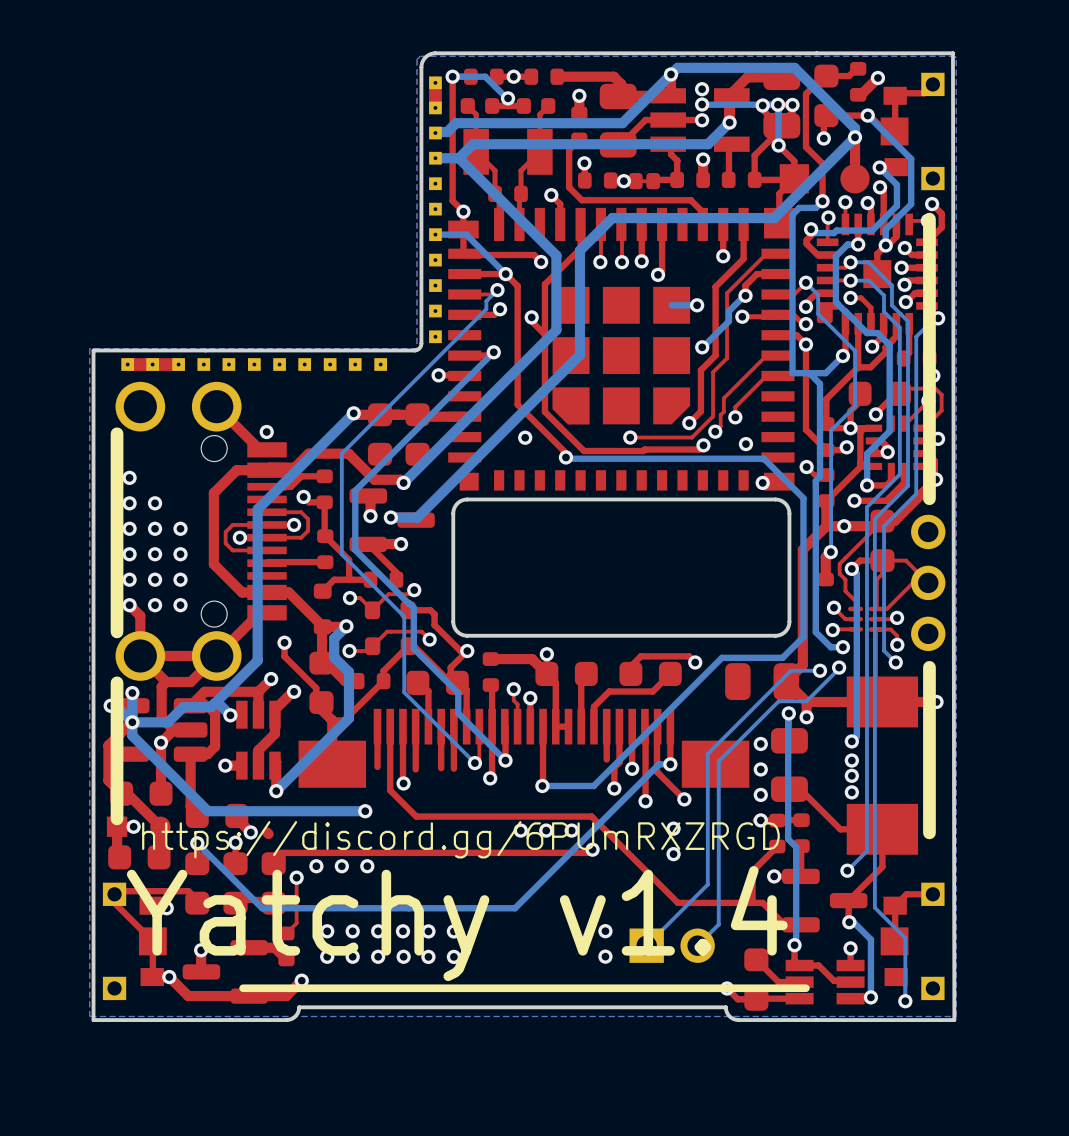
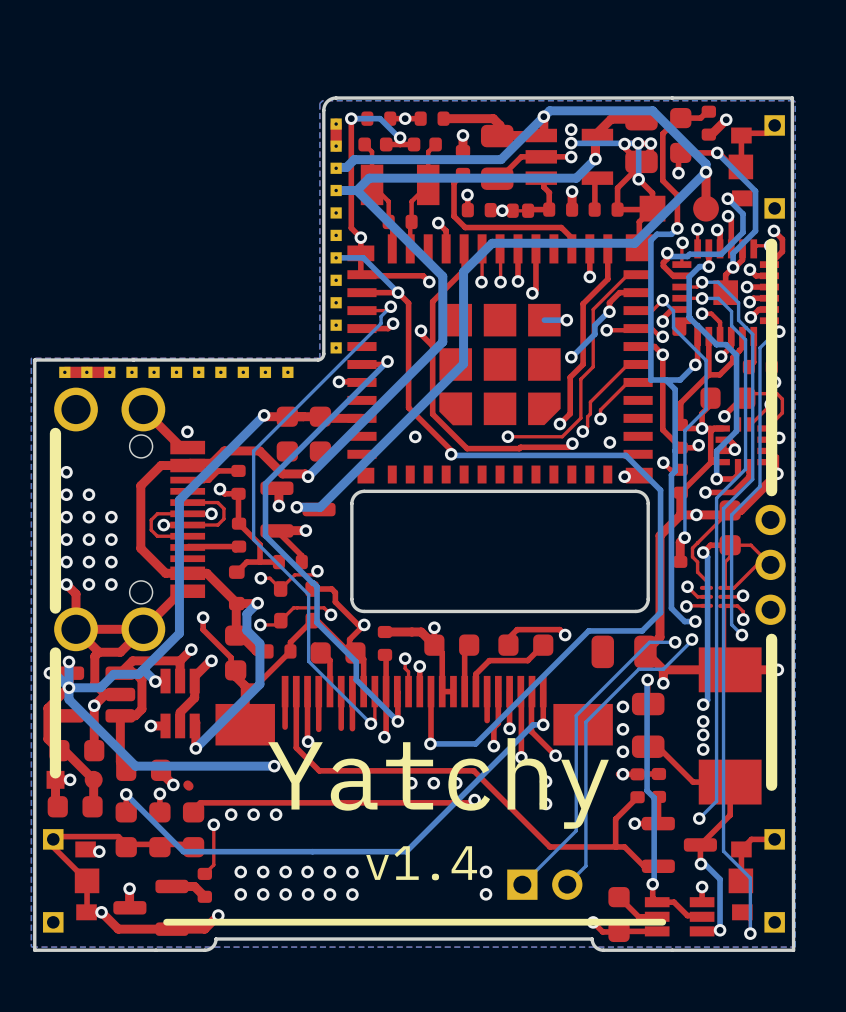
text: https://discord.gg/6PUmRXZRGD (460, 839) -> none
text: none -> v1.4 (421, 863)
text: Yatchy v1.4 (457, 923) -> Yatchy (438, 783)

